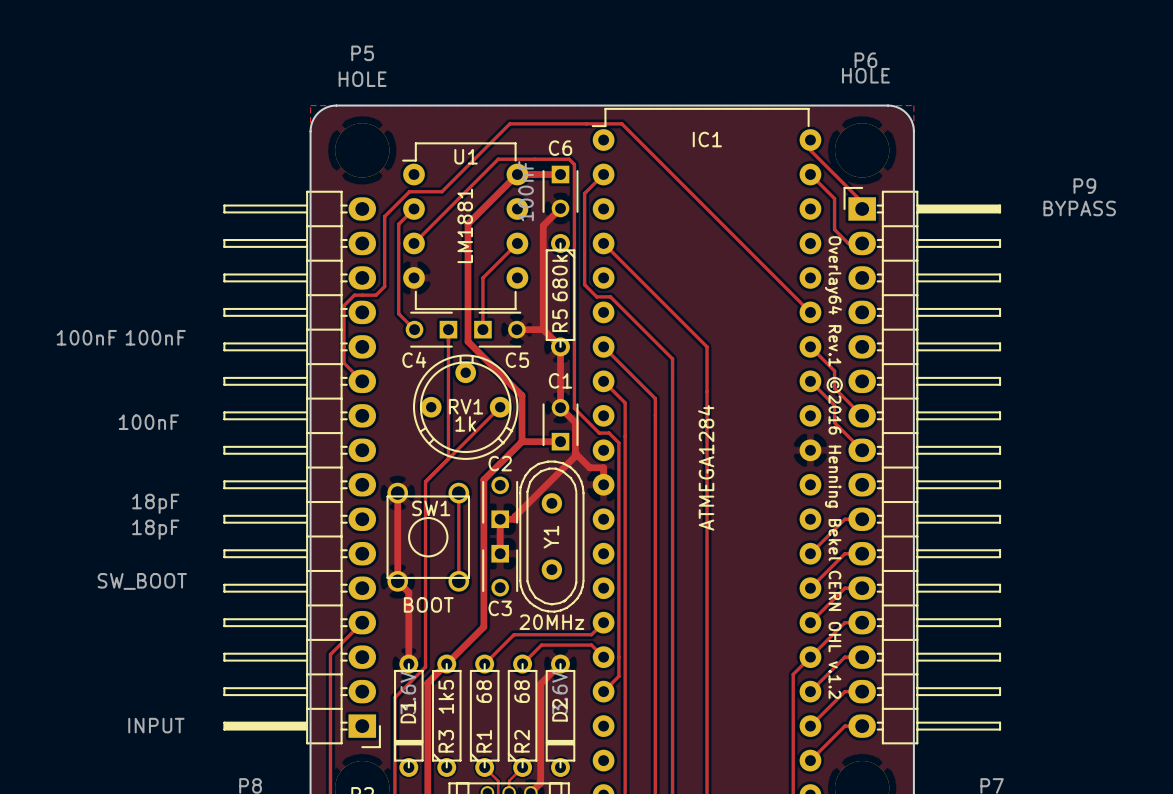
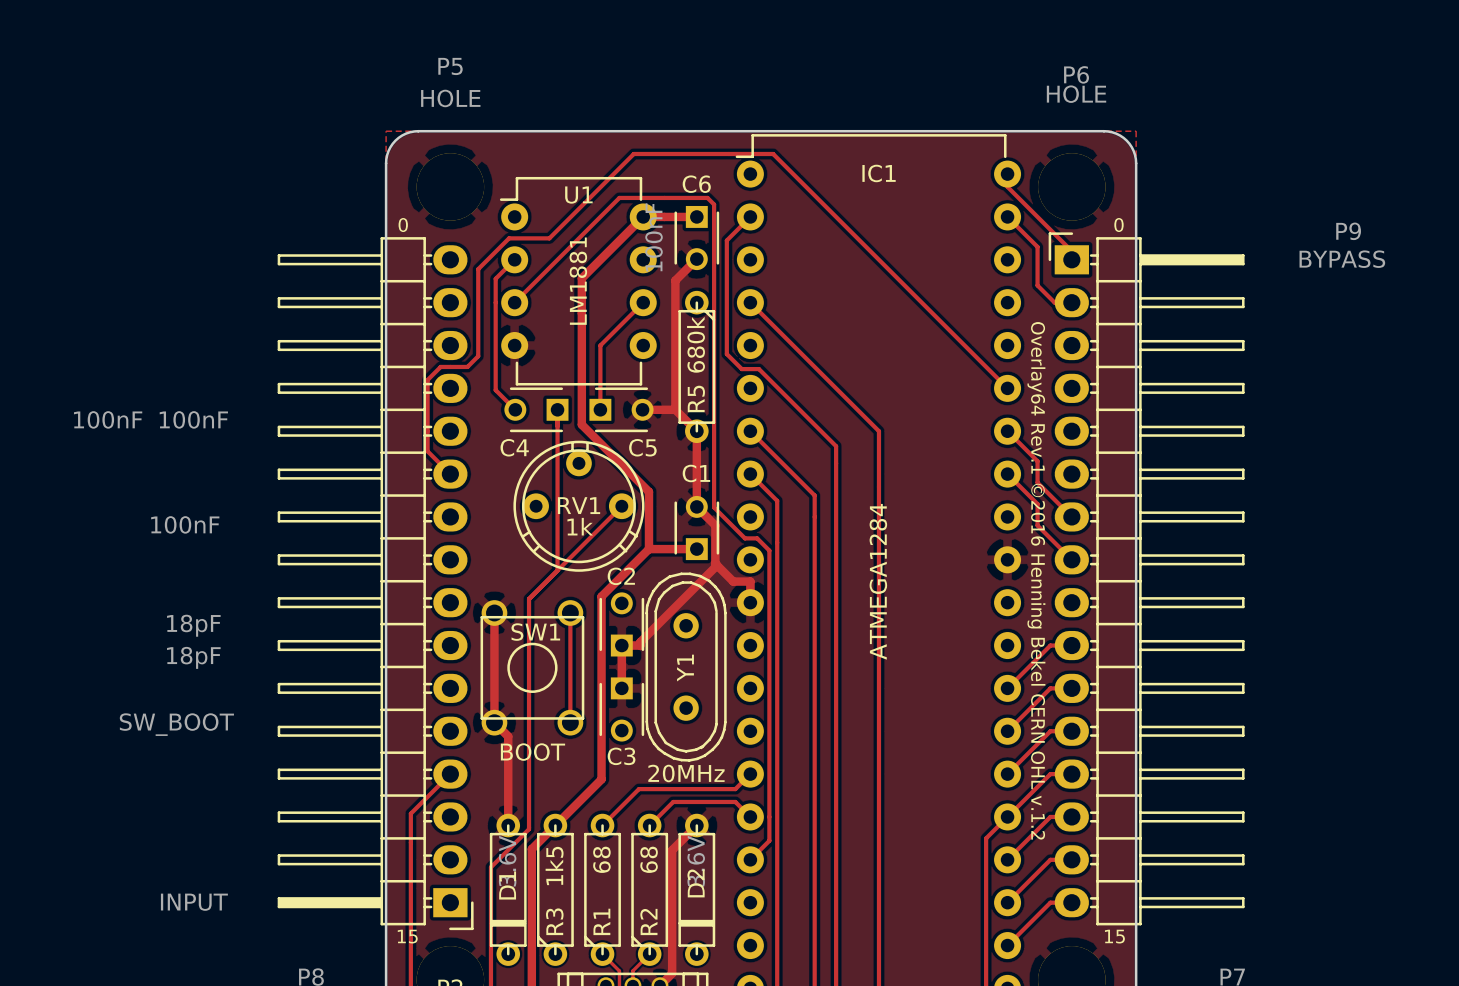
text: none -> 0 (403, 225)
text: none -> 0 (1118, 225)
text: none -> 15 (407, 936)
text: none -> 15 (1114, 936)

